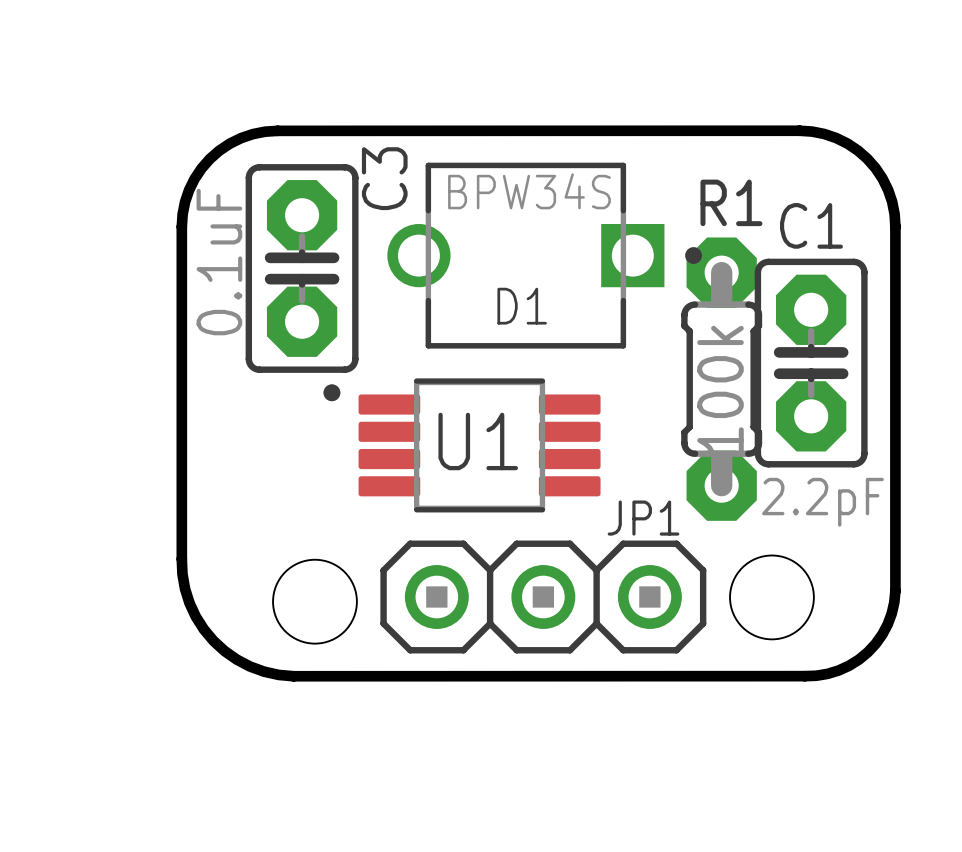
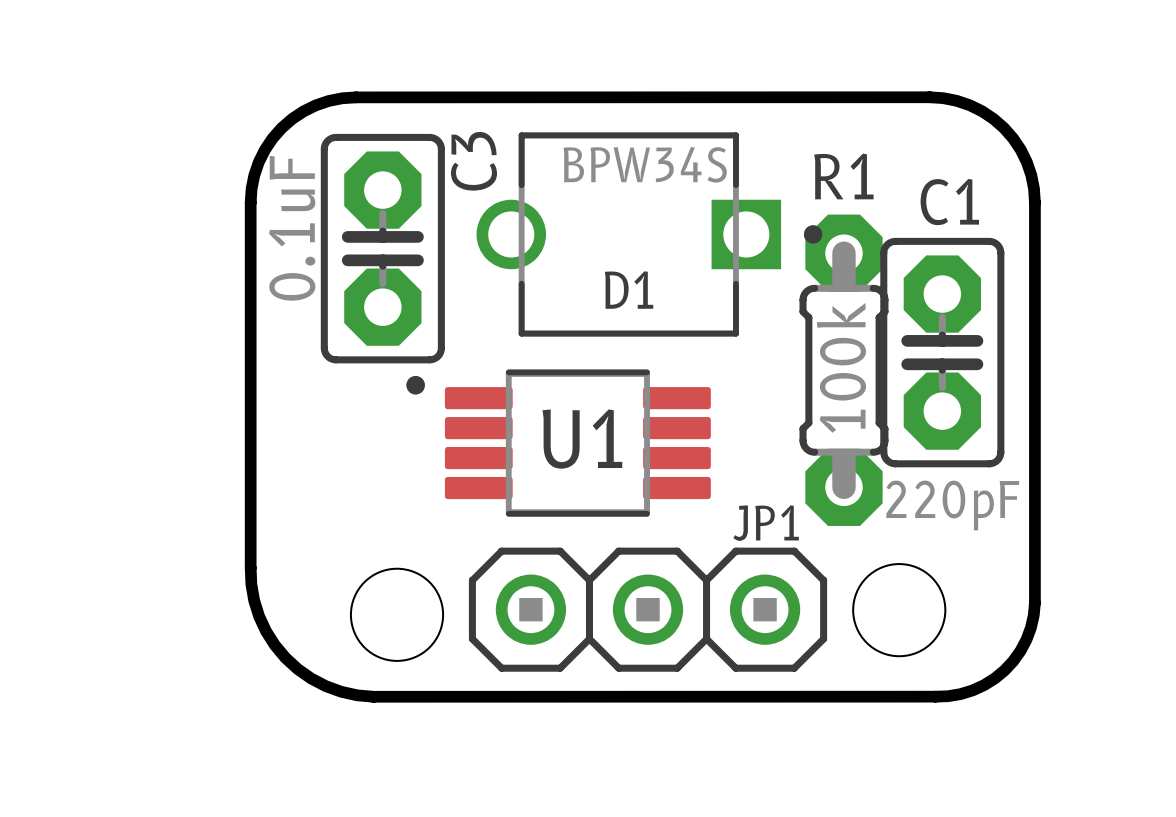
C1 value: 2.2pF (822, 502) -> 220pF (952, 505)

